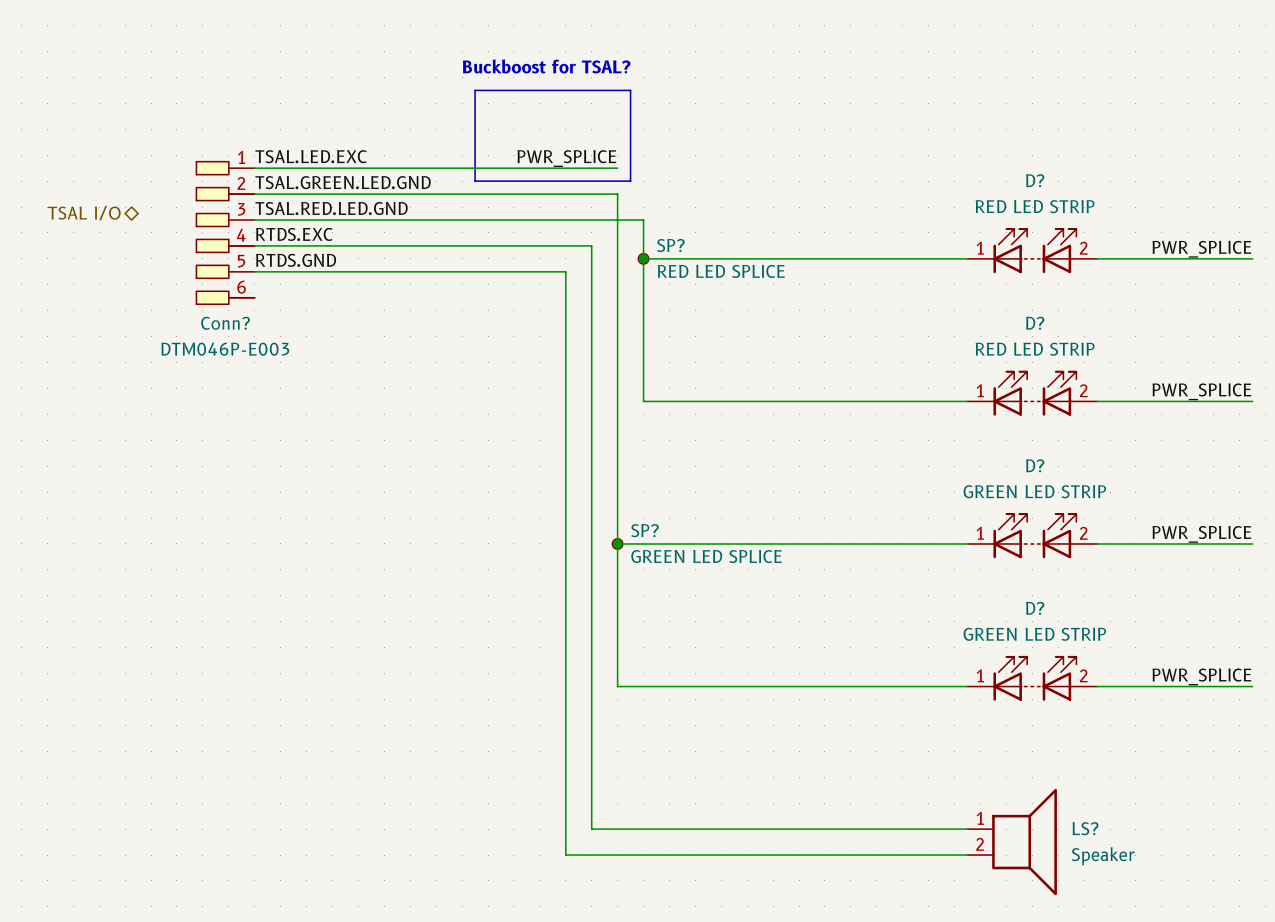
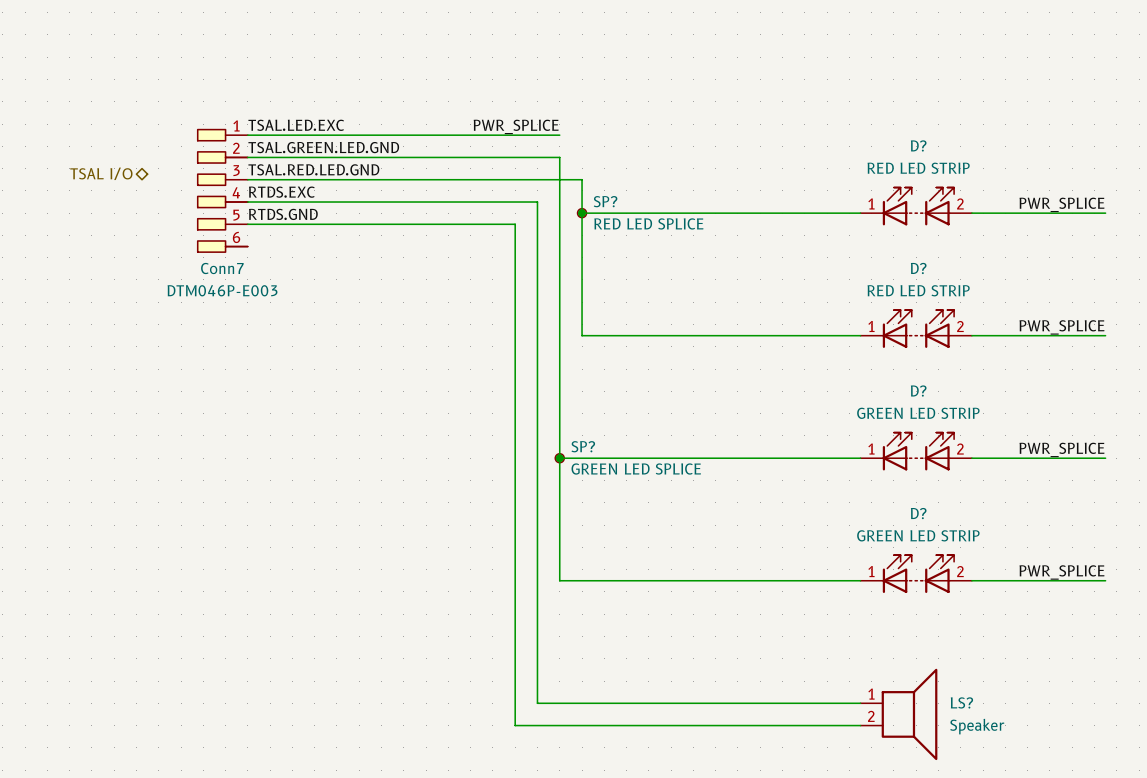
text: Buckboost for TSAL? (546, 66) -> none
line: (475, 90) (630, 90) (630, 181) (475, 181) (475, 90) -> none
Conn? name: Conn? (225, 323) -> Conn7 (222, 268)

